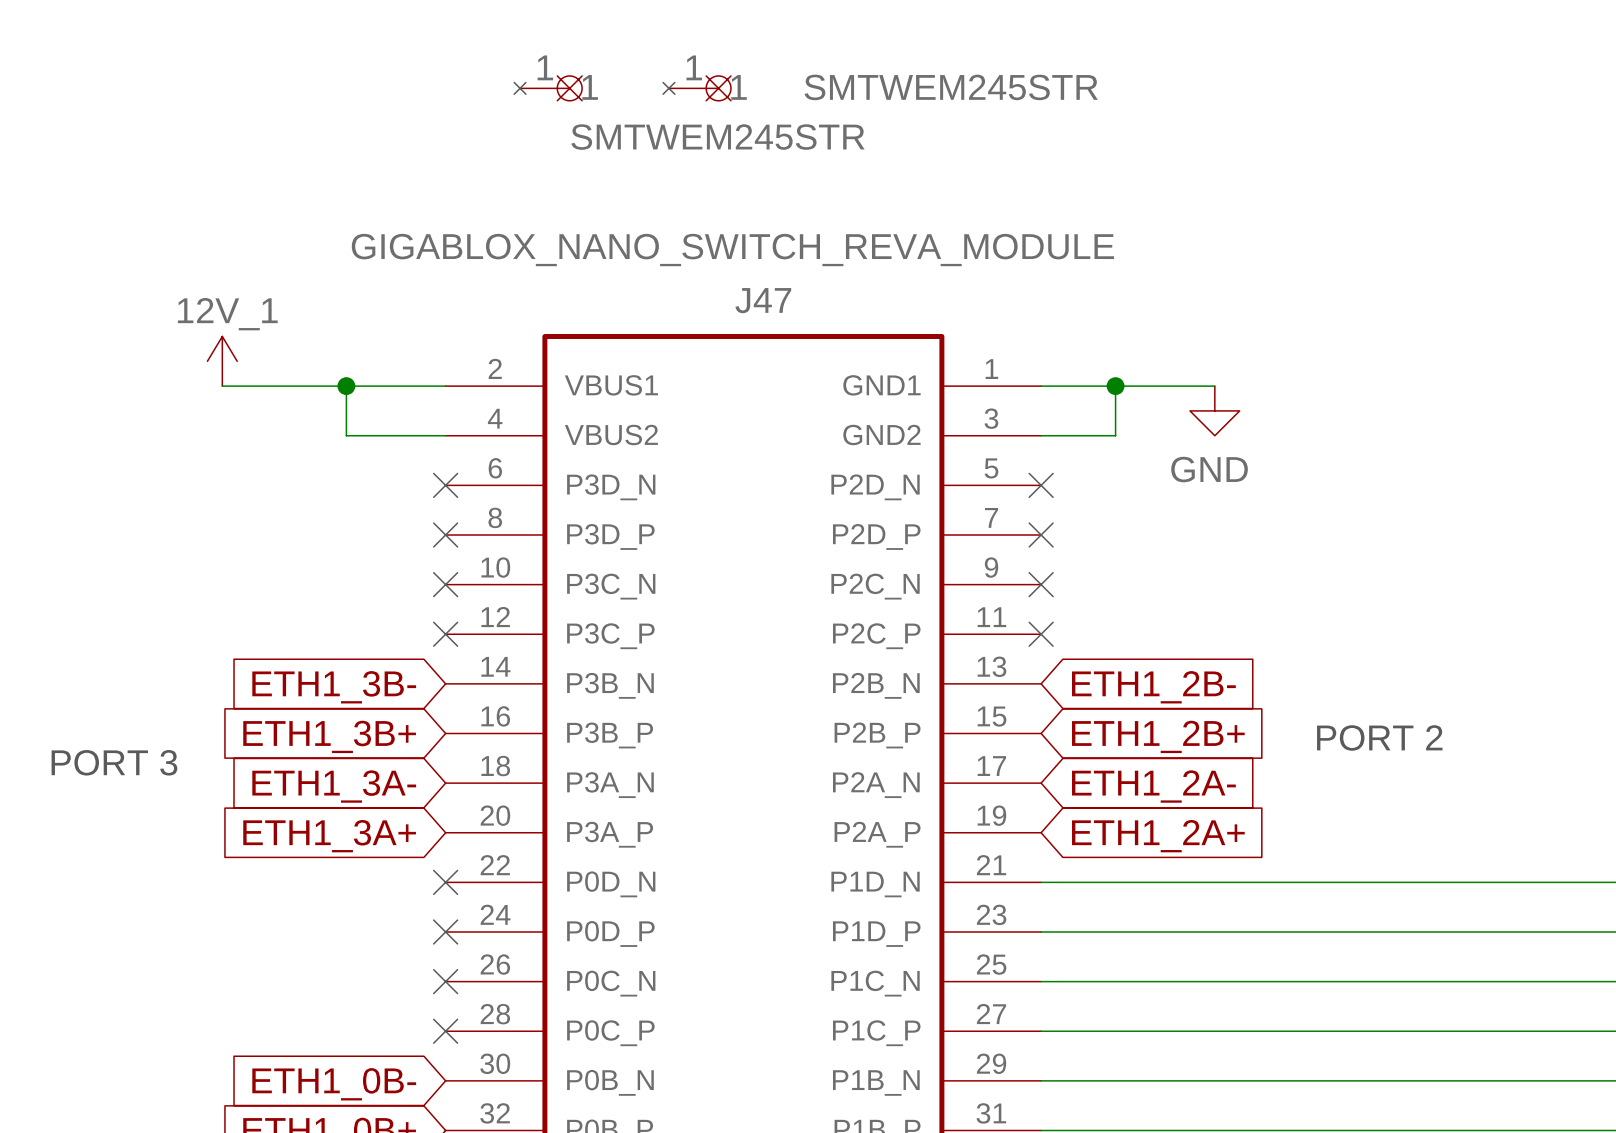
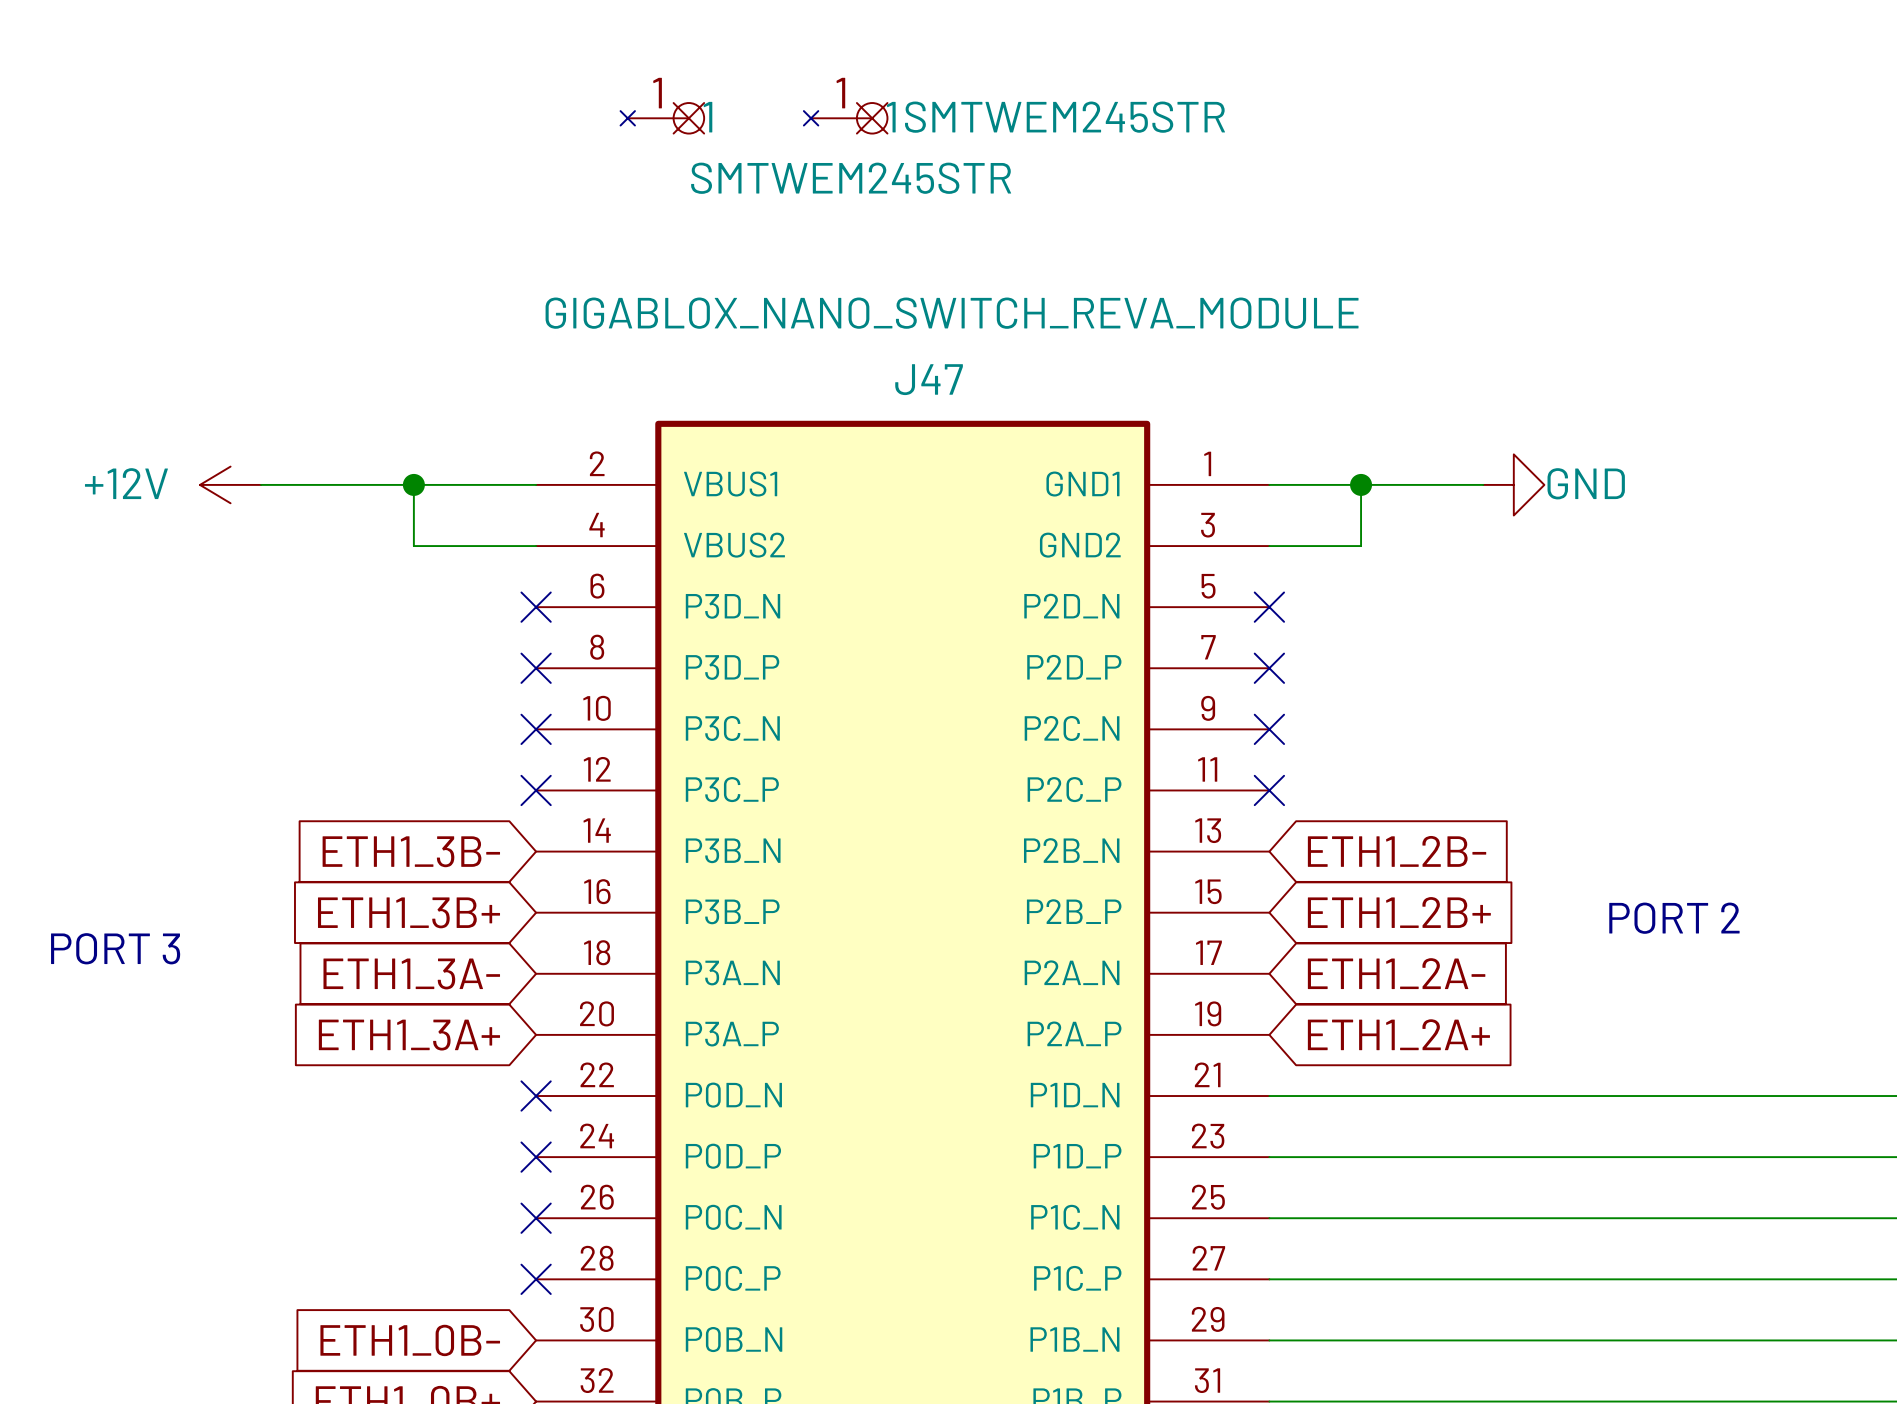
part value position: SMTWEM245STR (951, 87) -> SMTWEM245STR (1065, 117)
power symbol: 12V_1 (222, 361) -> none
power symbol: none -> +12V (230, 484)
power symbol rotation: 0° (1214, 410) -> 90° counterclockwise (1513, 484)
power symbol position: GND (1214, 410) -> GND (1513, 484)

